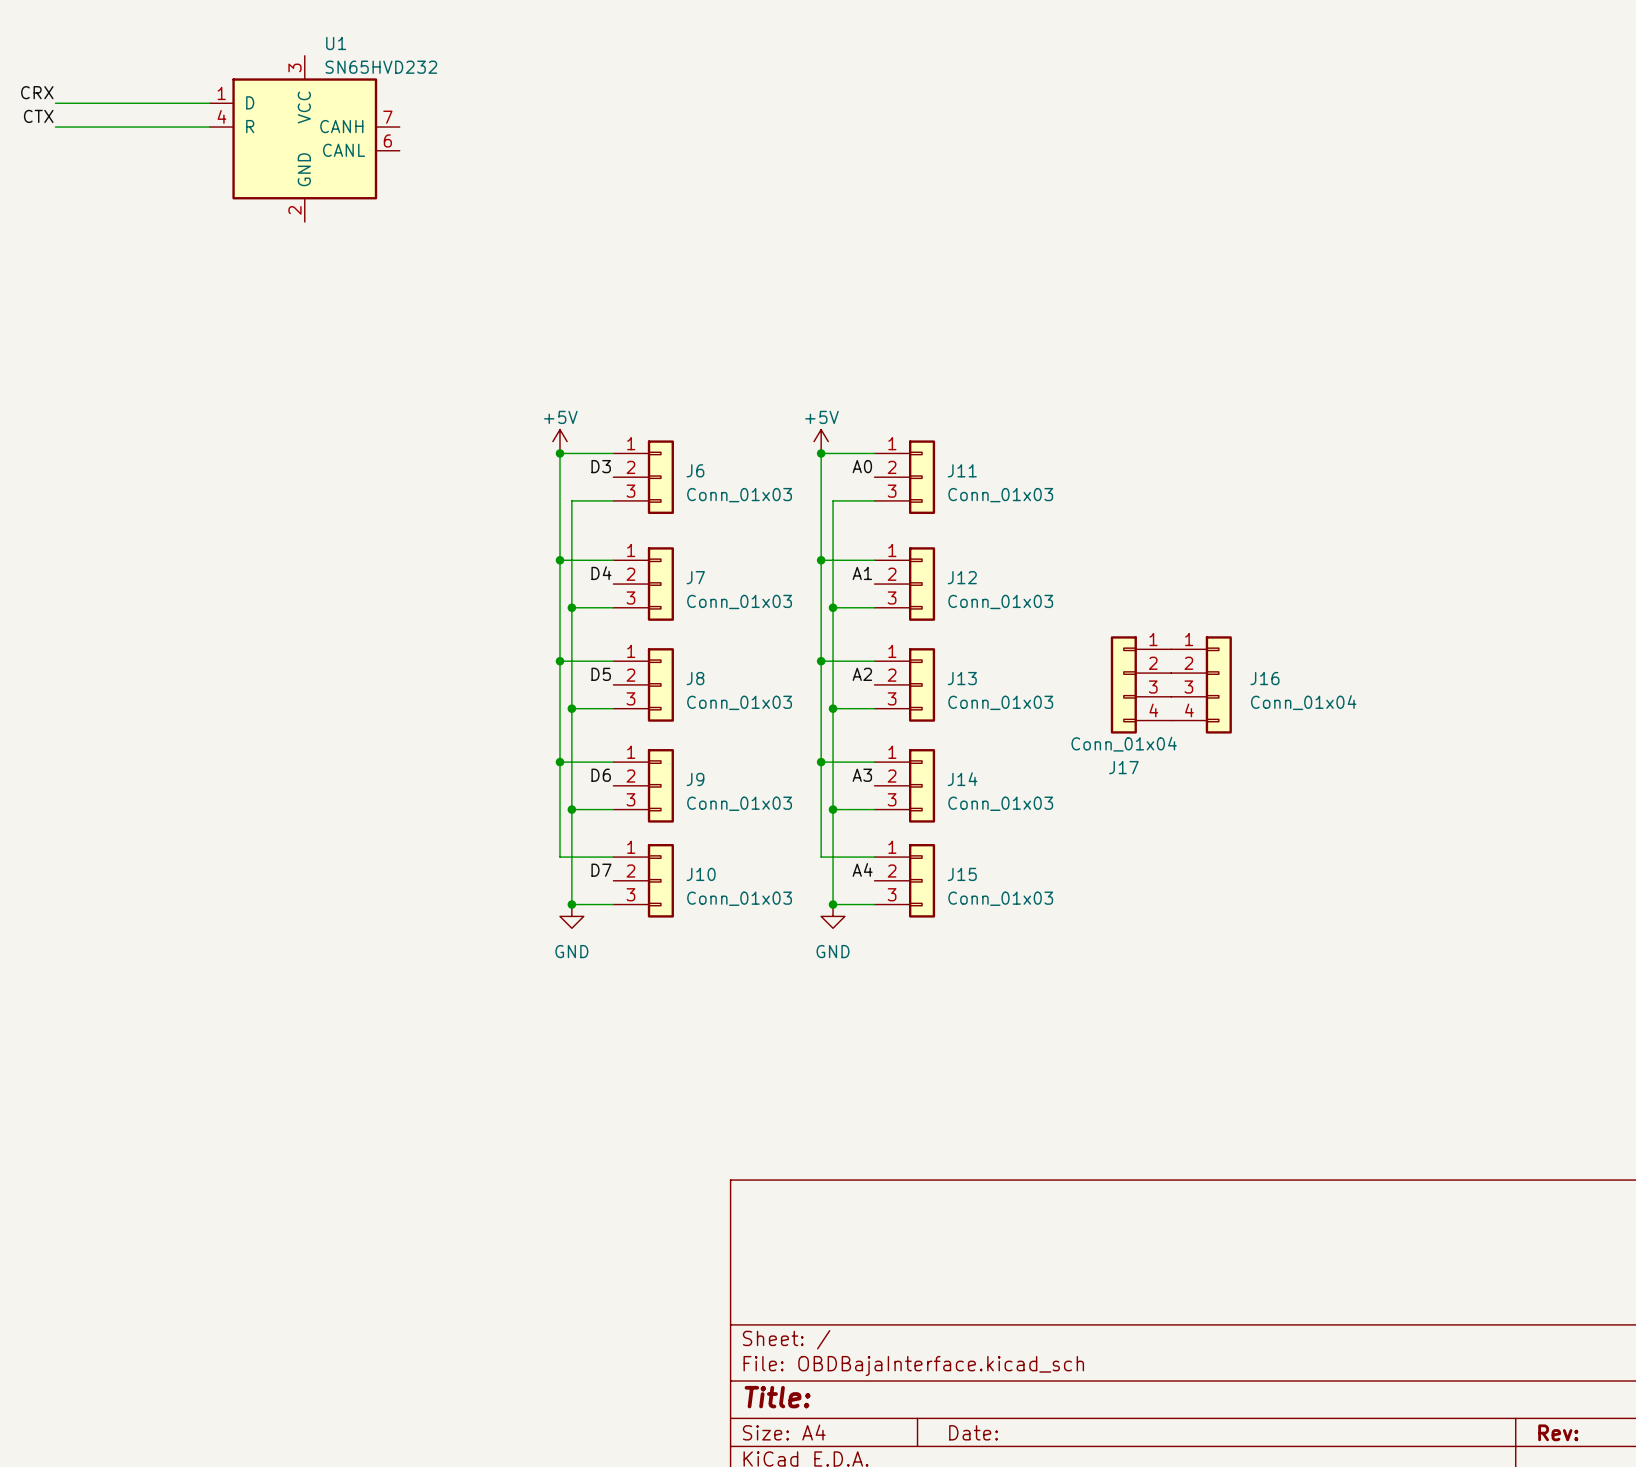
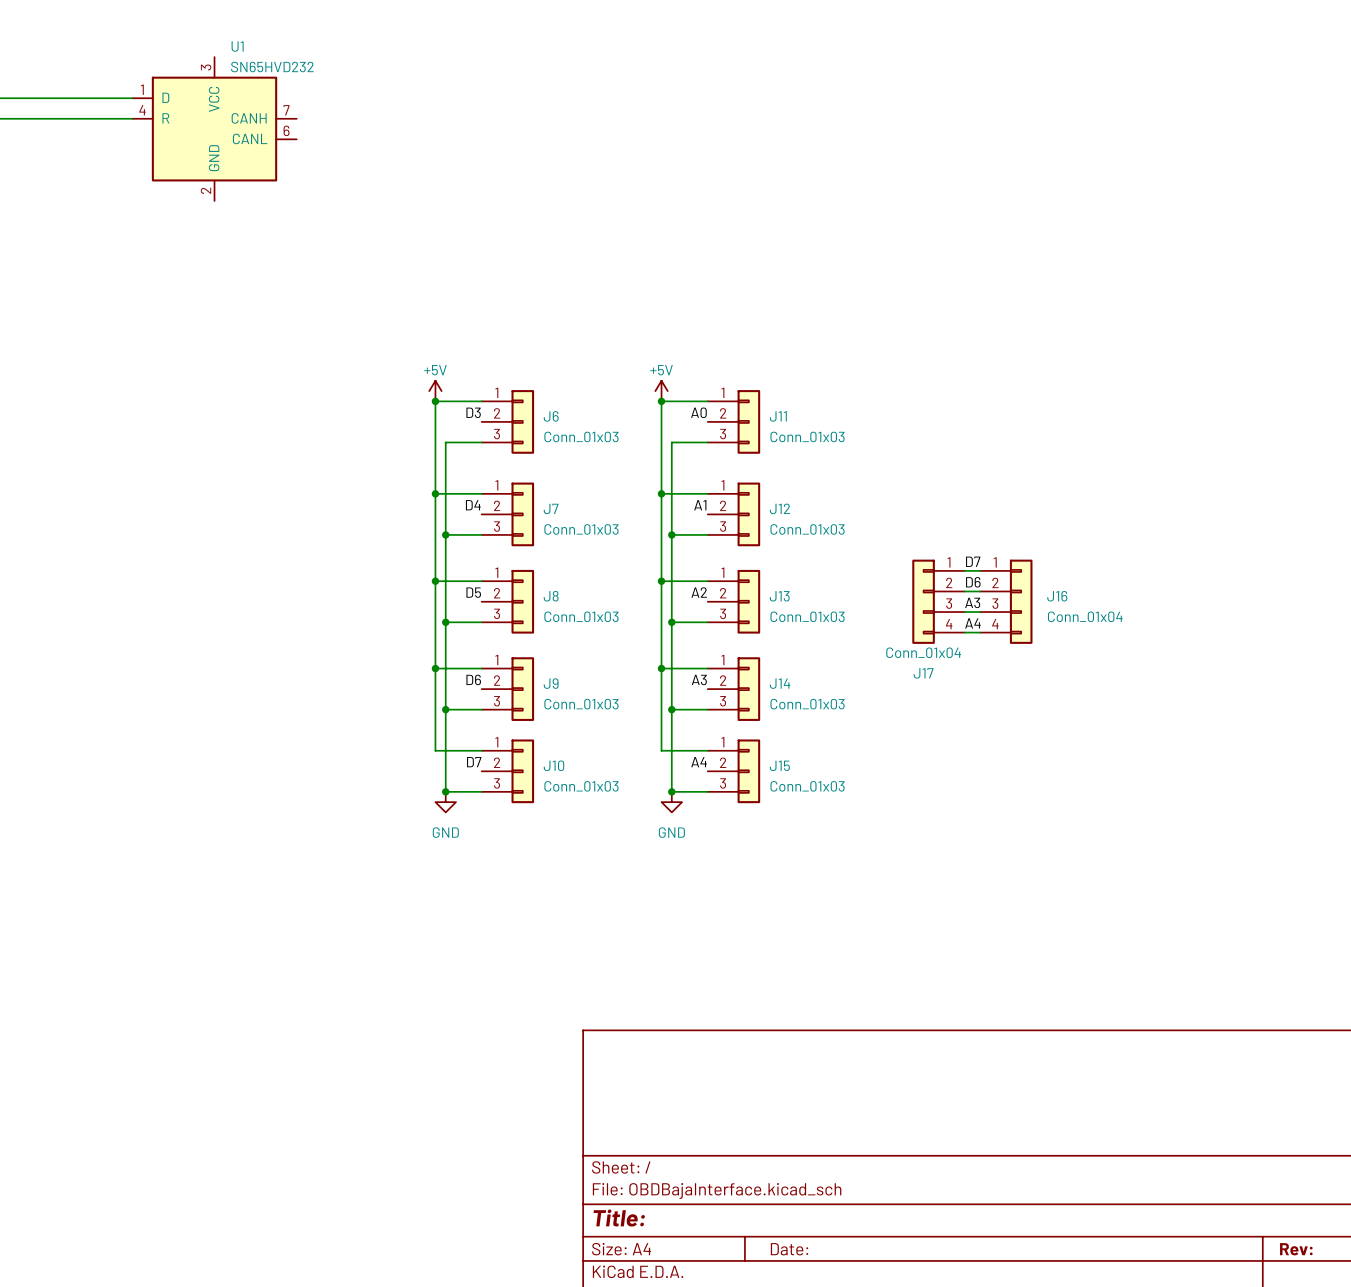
label: none -> D7 (973, 561)
label: none -> D6 (973, 582)
J16 position: (1201, 684) -> (1006, 601)
label: none -> A3 (972, 602)
label: none -> A4 (972, 623)

